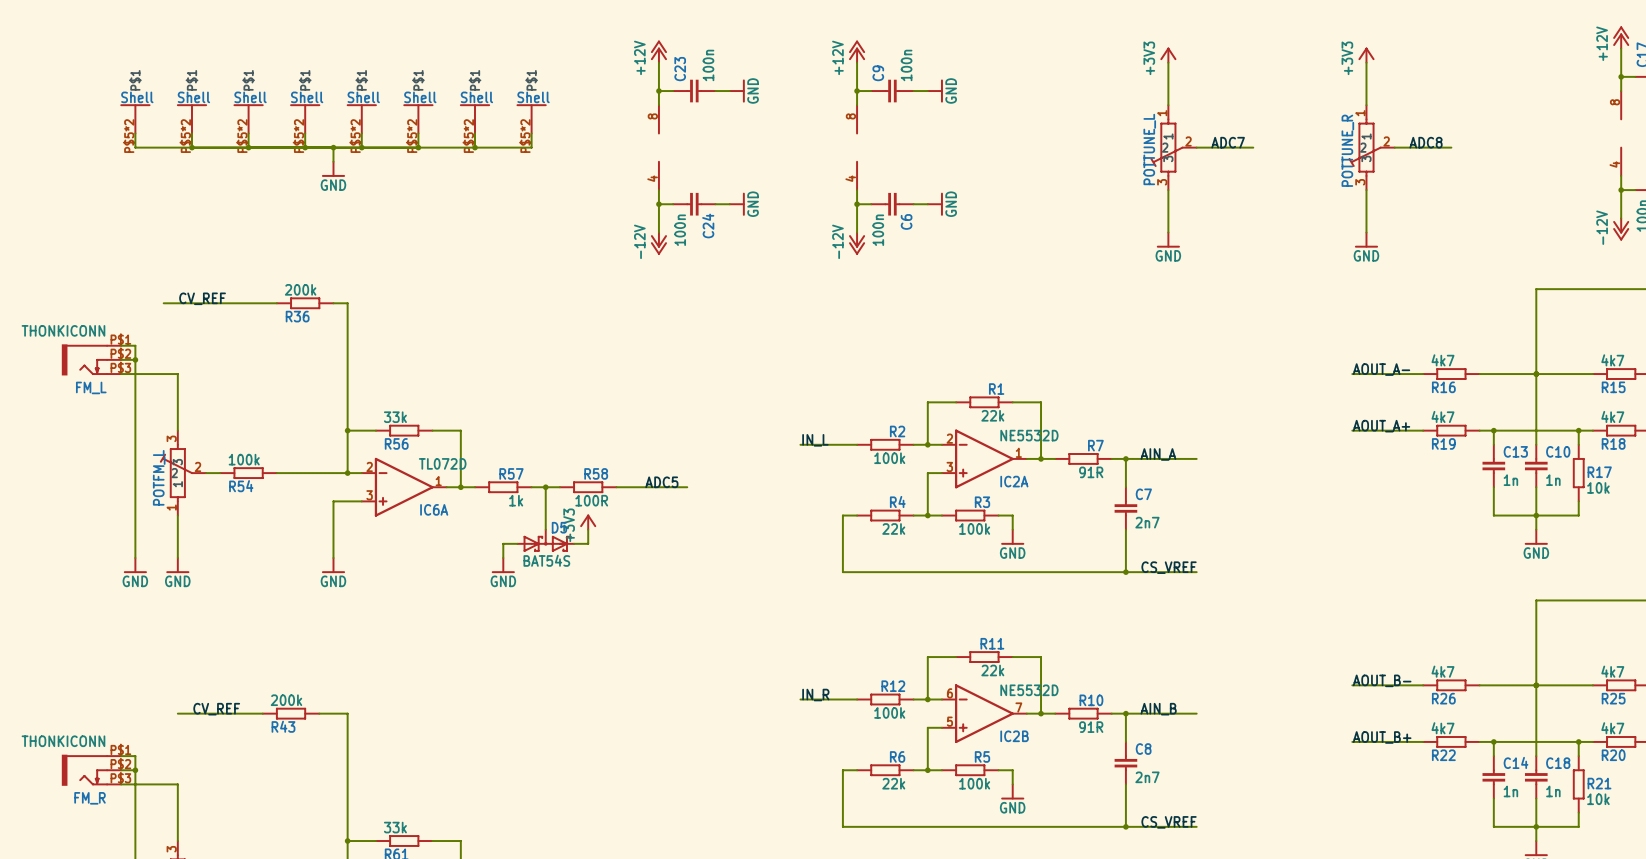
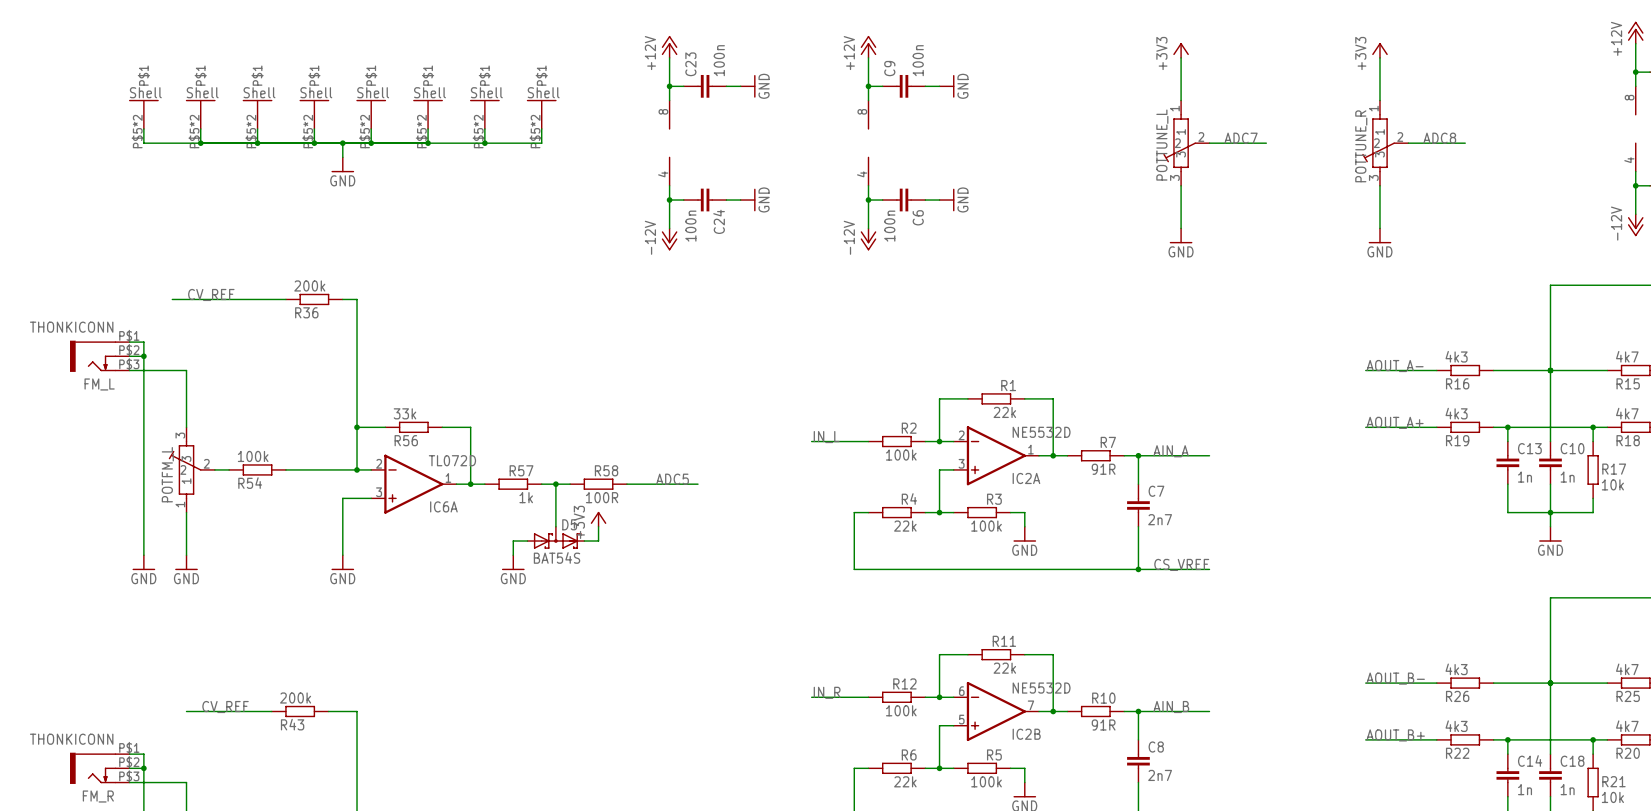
R16 value: 4k7 (1442, 360) -> 4k3 (1456, 356)
R19 value: 4k7 (1442, 416) -> 4k3 (1456, 413)
R26 value: 4k7 (1442, 671) -> 4k3 (1456, 669)
R22 value: 4k7 (1442, 728) -> 4k3 (1456, 726)

